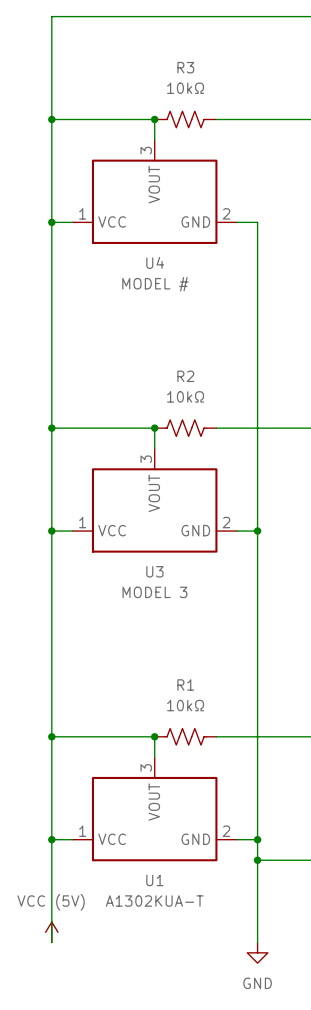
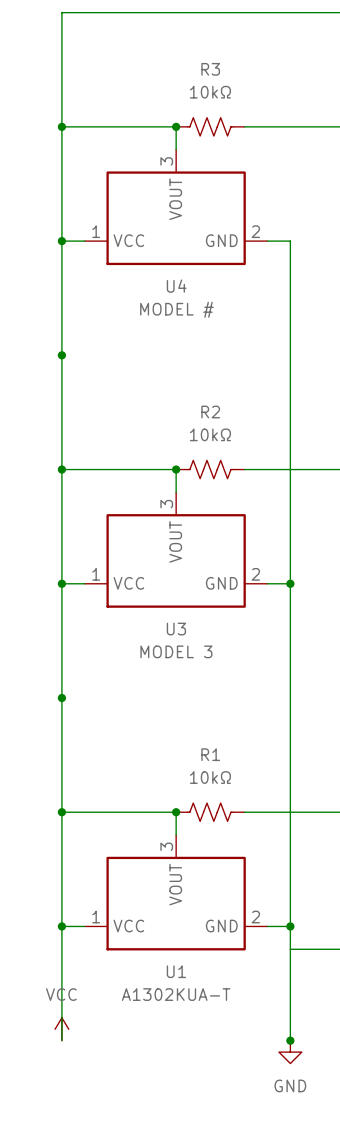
junction: none -> (61, 355)
junction: none -> (61, 698)
junction: (257, 860) -> none
power symbol: VCC (5V) (51, 932) -> VCC (61, 1029)
junction: none -> (290, 1040)

